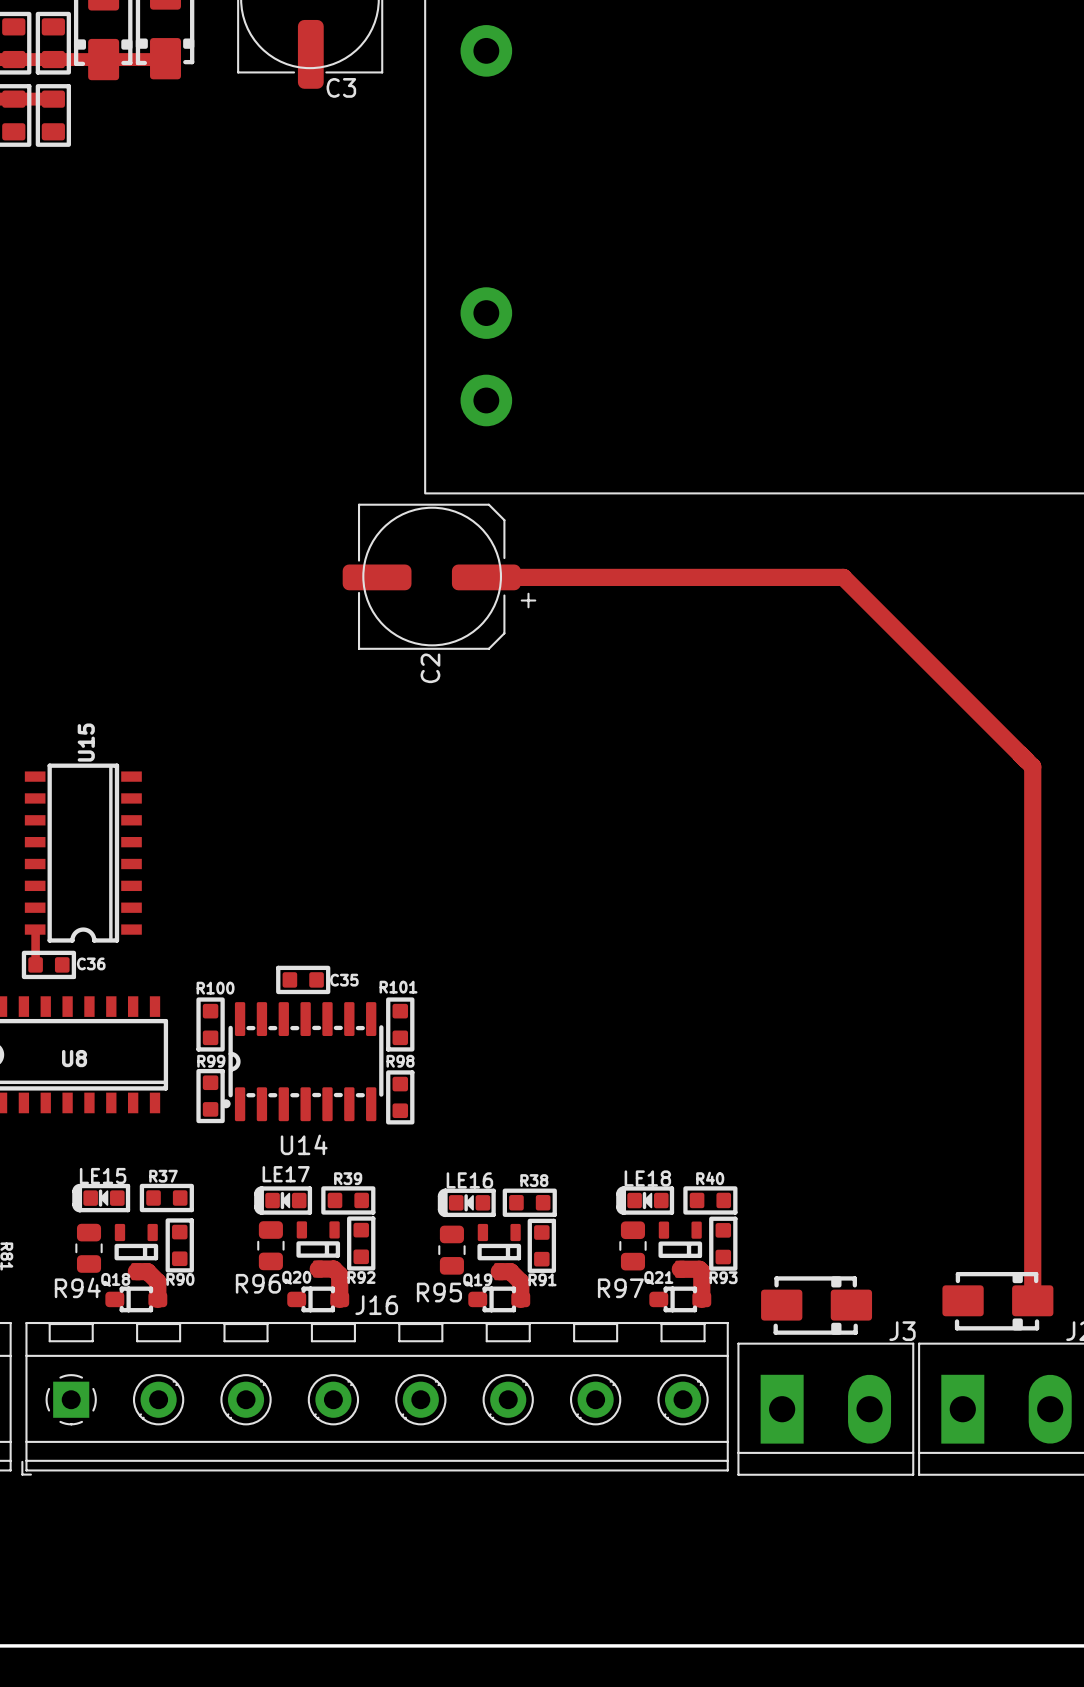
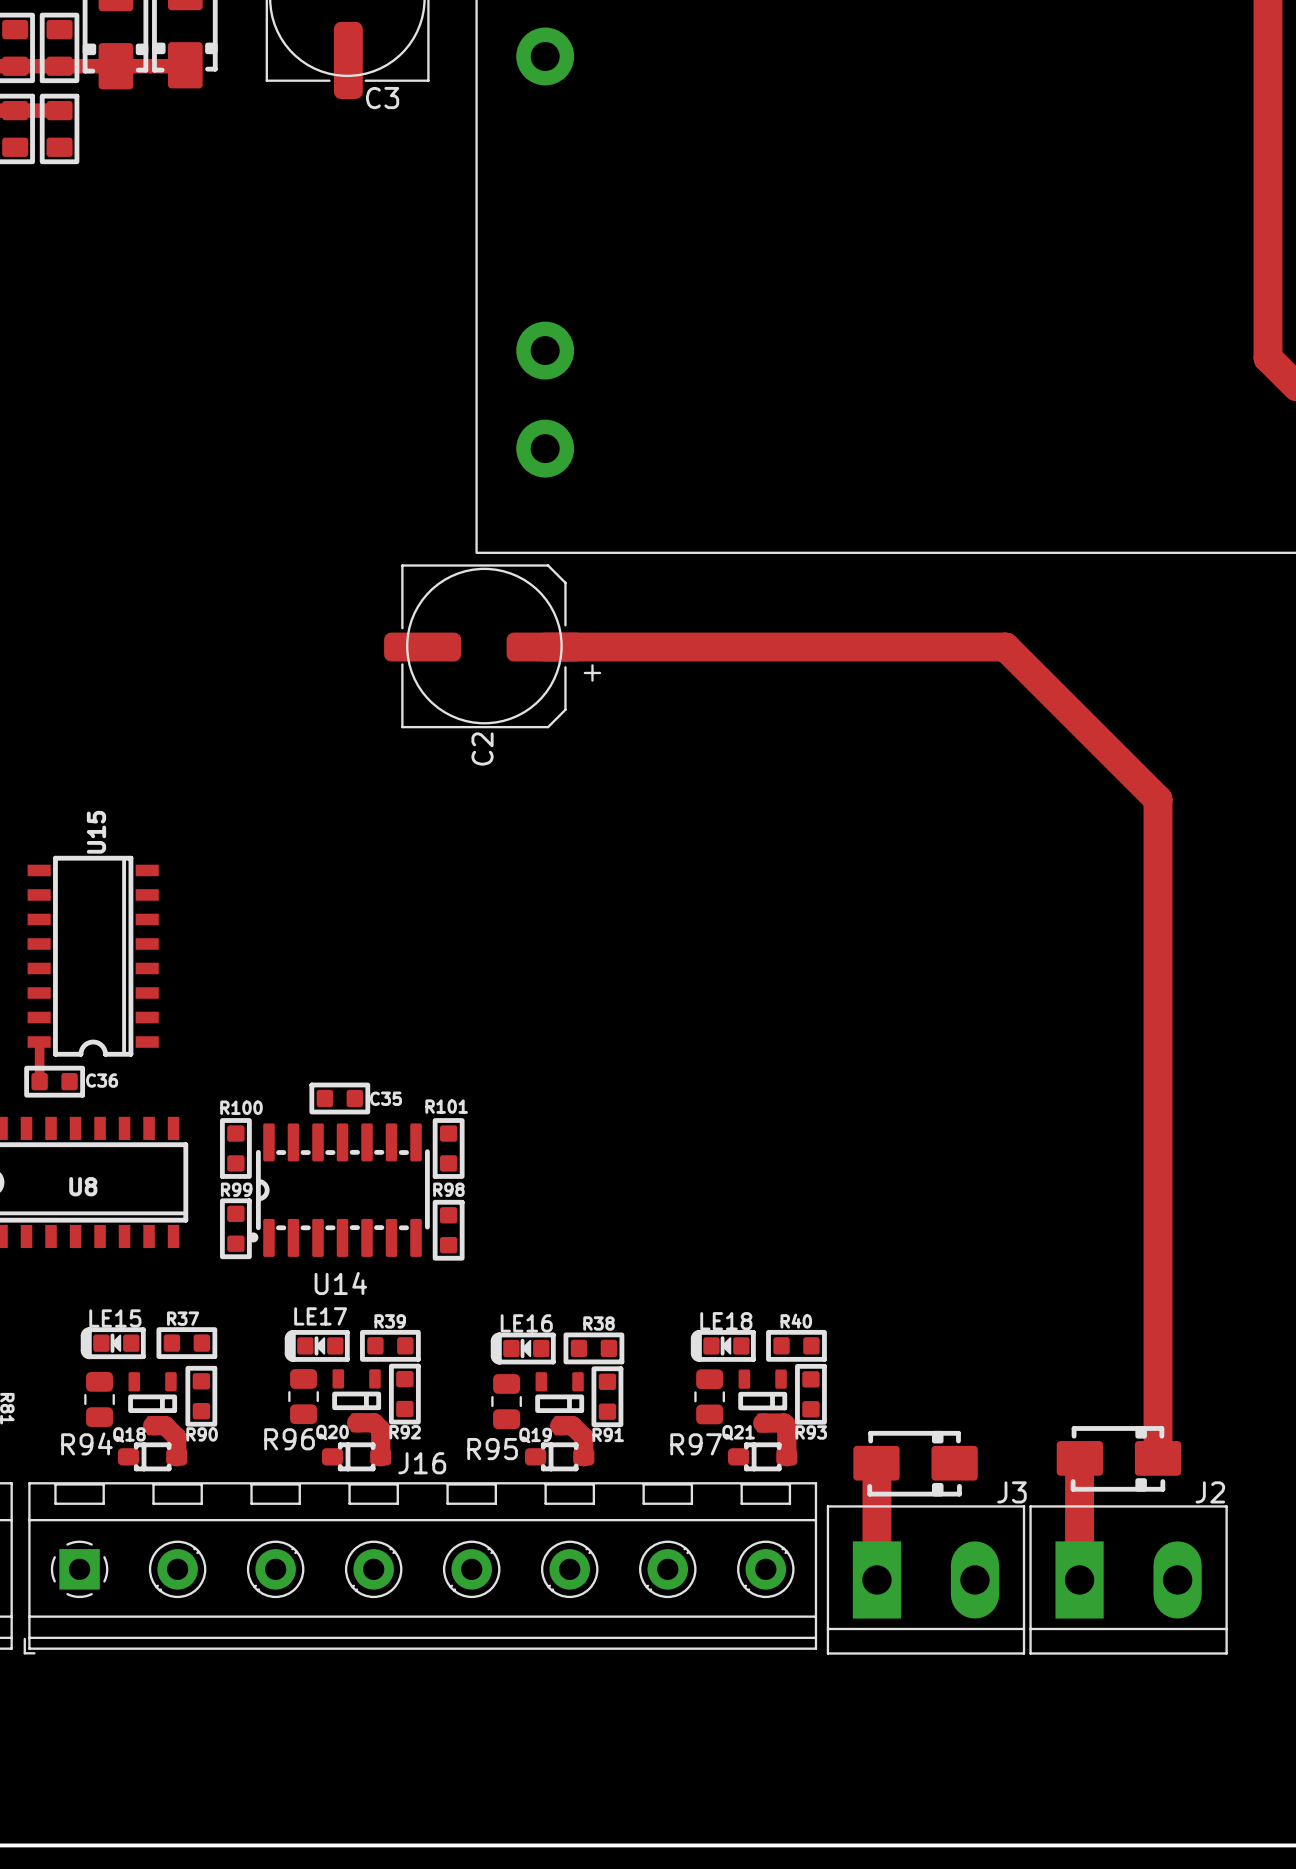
track width: thin (486, 577) (843, 577) -> thick (545, 647) (945, 647)
track: (843, 577) (1032, 766) -> (945, 647) (1005, 647) (1158, 799) (1158, 859)
track width: thin (1032, 766) (1032, 1300) -> thick (1158, 859) (1158, 1458)
track: none -> (1079, 1458) (1079, 1579)
track: none -> (876, 1463) (876, 1579)

